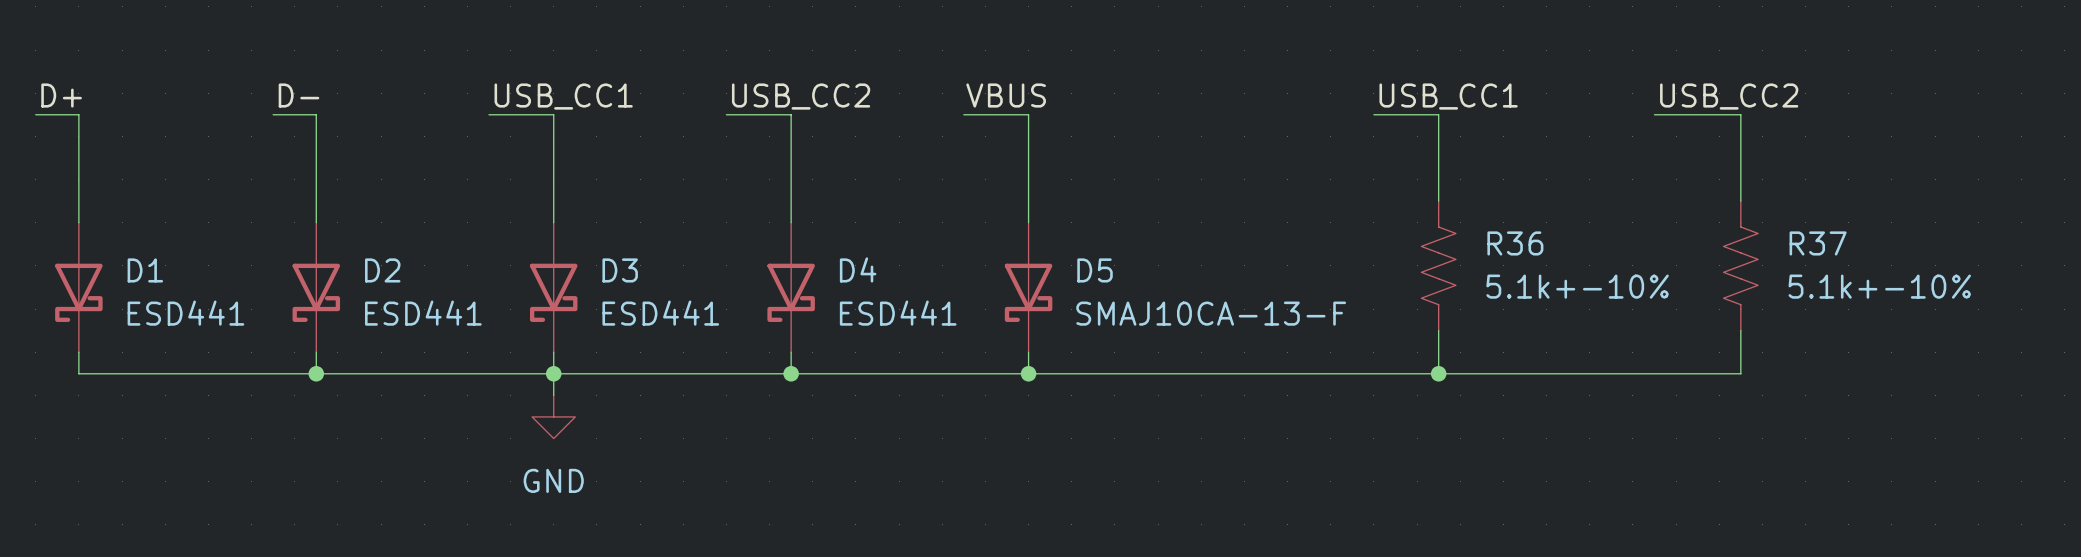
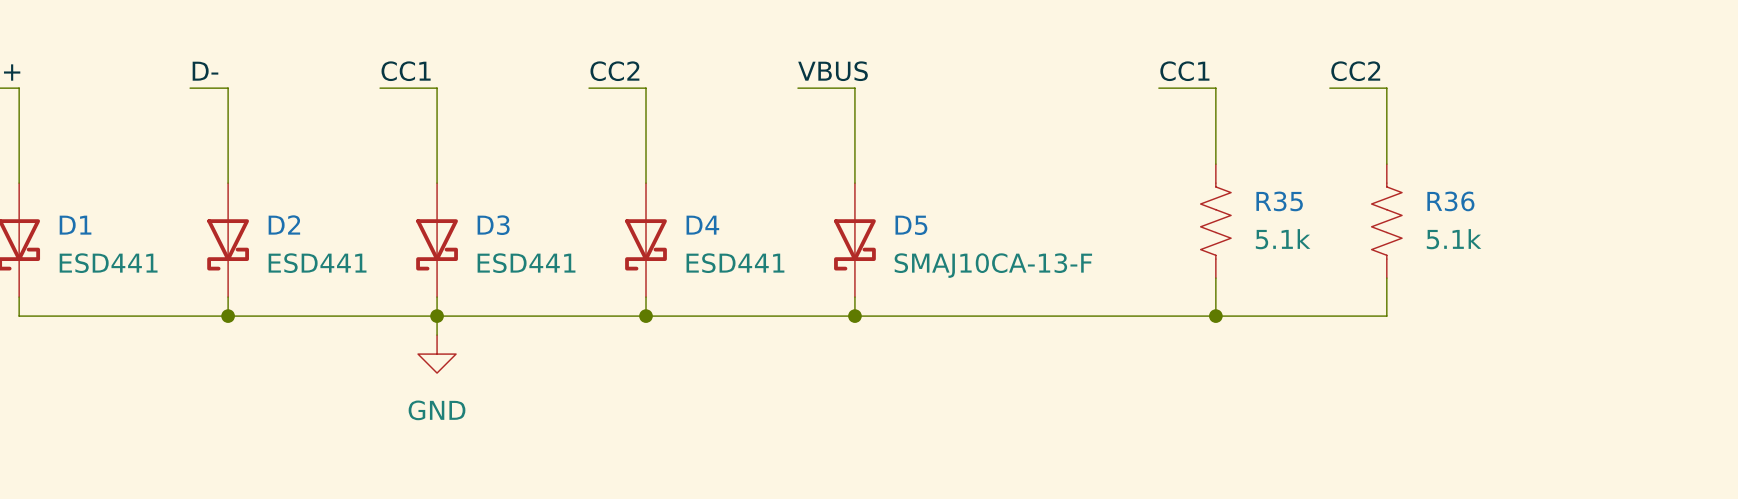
label: none -> CC2 (1355, 71)
label: USB_CC1 (563, 96) -> CC1 (406, 71)
label: USB_CC2 (801, 96) -> CC2 (614, 71)
label: USB_CC1 (1448, 96) -> CC1 (1184, 71)
label: USB_CC2 (1729, 96) -> none
wire: none -> (1329, 88) (1386, 88) (1386, 164)
wire: (1654, 114) (1740, 114) (1740, 201) -> none
R36 name: R36 (1515, 243) -> R35 (1279, 201)
R36: none -> 5.1k (1386, 221)
R37: 5.1k+-10% (1740, 265) -> none
R36 value: 5.1k+-10% (1577, 286) -> 5.1k (1283, 239)
wire: (1740, 330) (1740, 373) (1632, 373) -> (1386, 278) (1386, 316)

